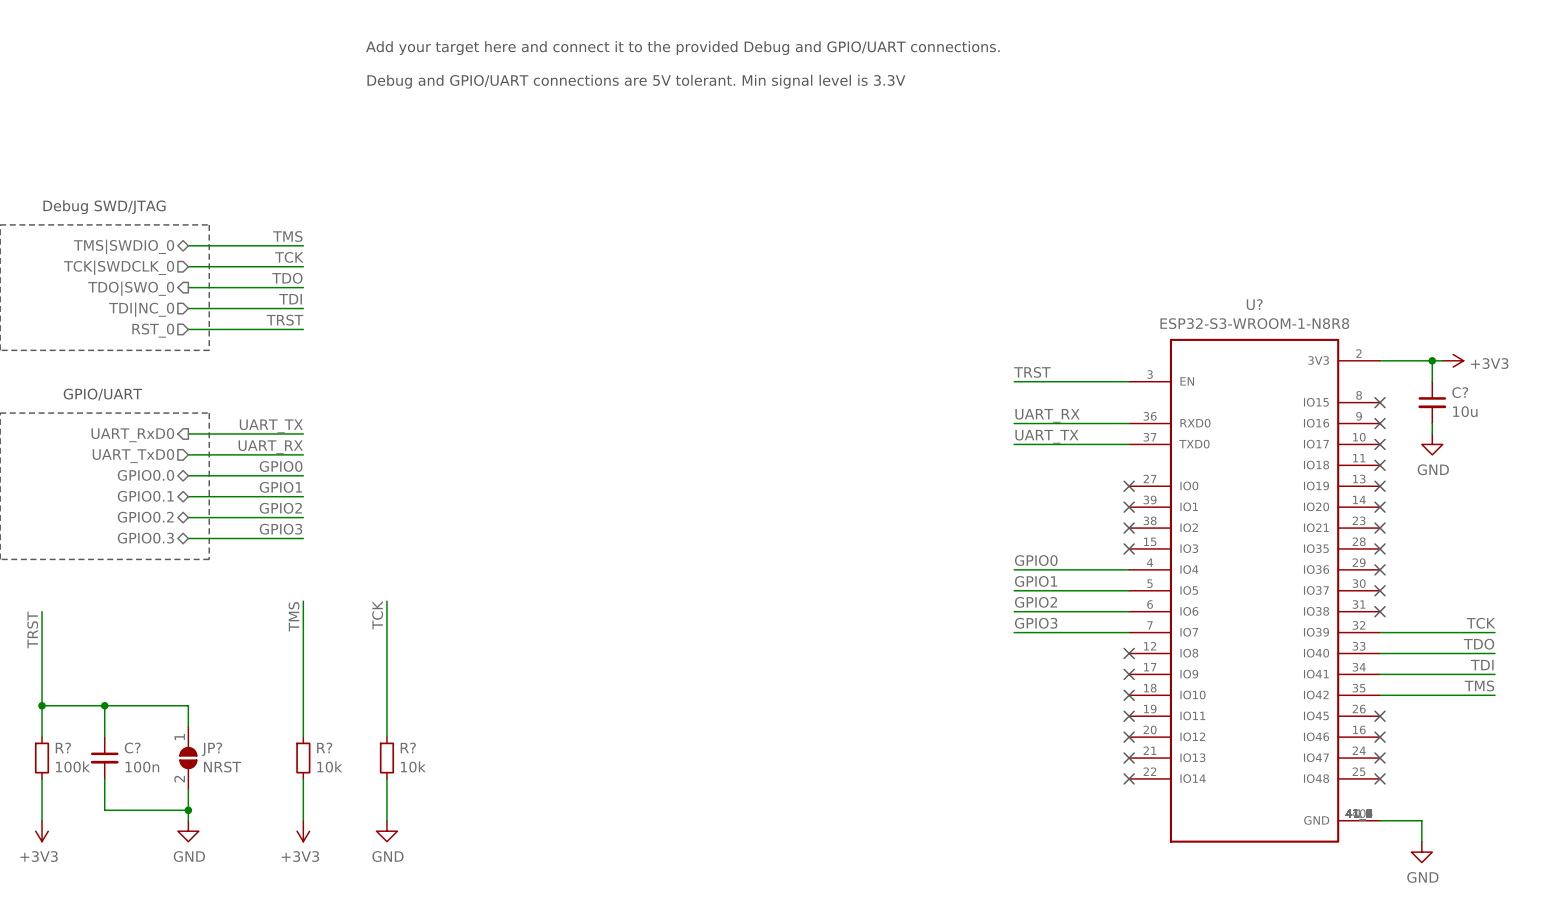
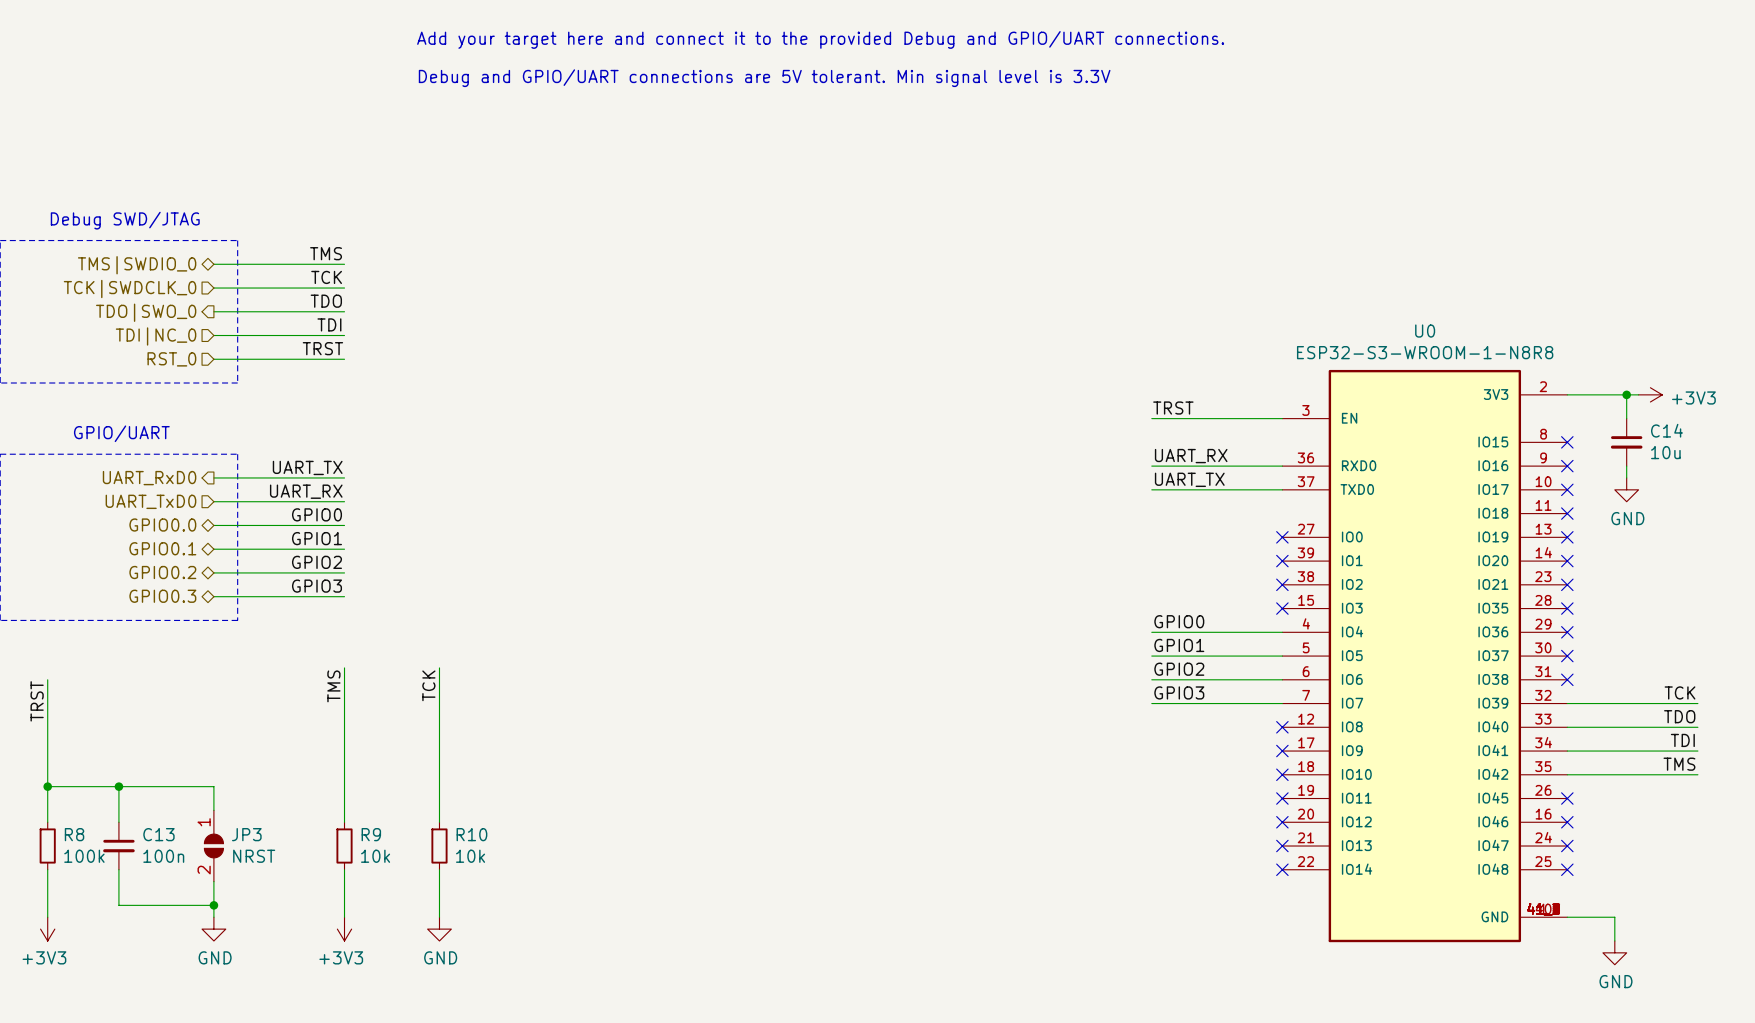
U? name: U? (1254, 304) -> U0 (1425, 331)
C? name: C? (1460, 392) -> C14 (1666, 430)
R? name: R? (63, 747) -> R8 (74, 834)
R? name: R? (324, 747) -> R9 (371, 834)
R? name: R? (408, 747) -> R10 (471, 834)
C? name: C? (132, 748) -> C13 (158, 834)
JP? name: JP? (211, 749) -> JP3 (246, 834)

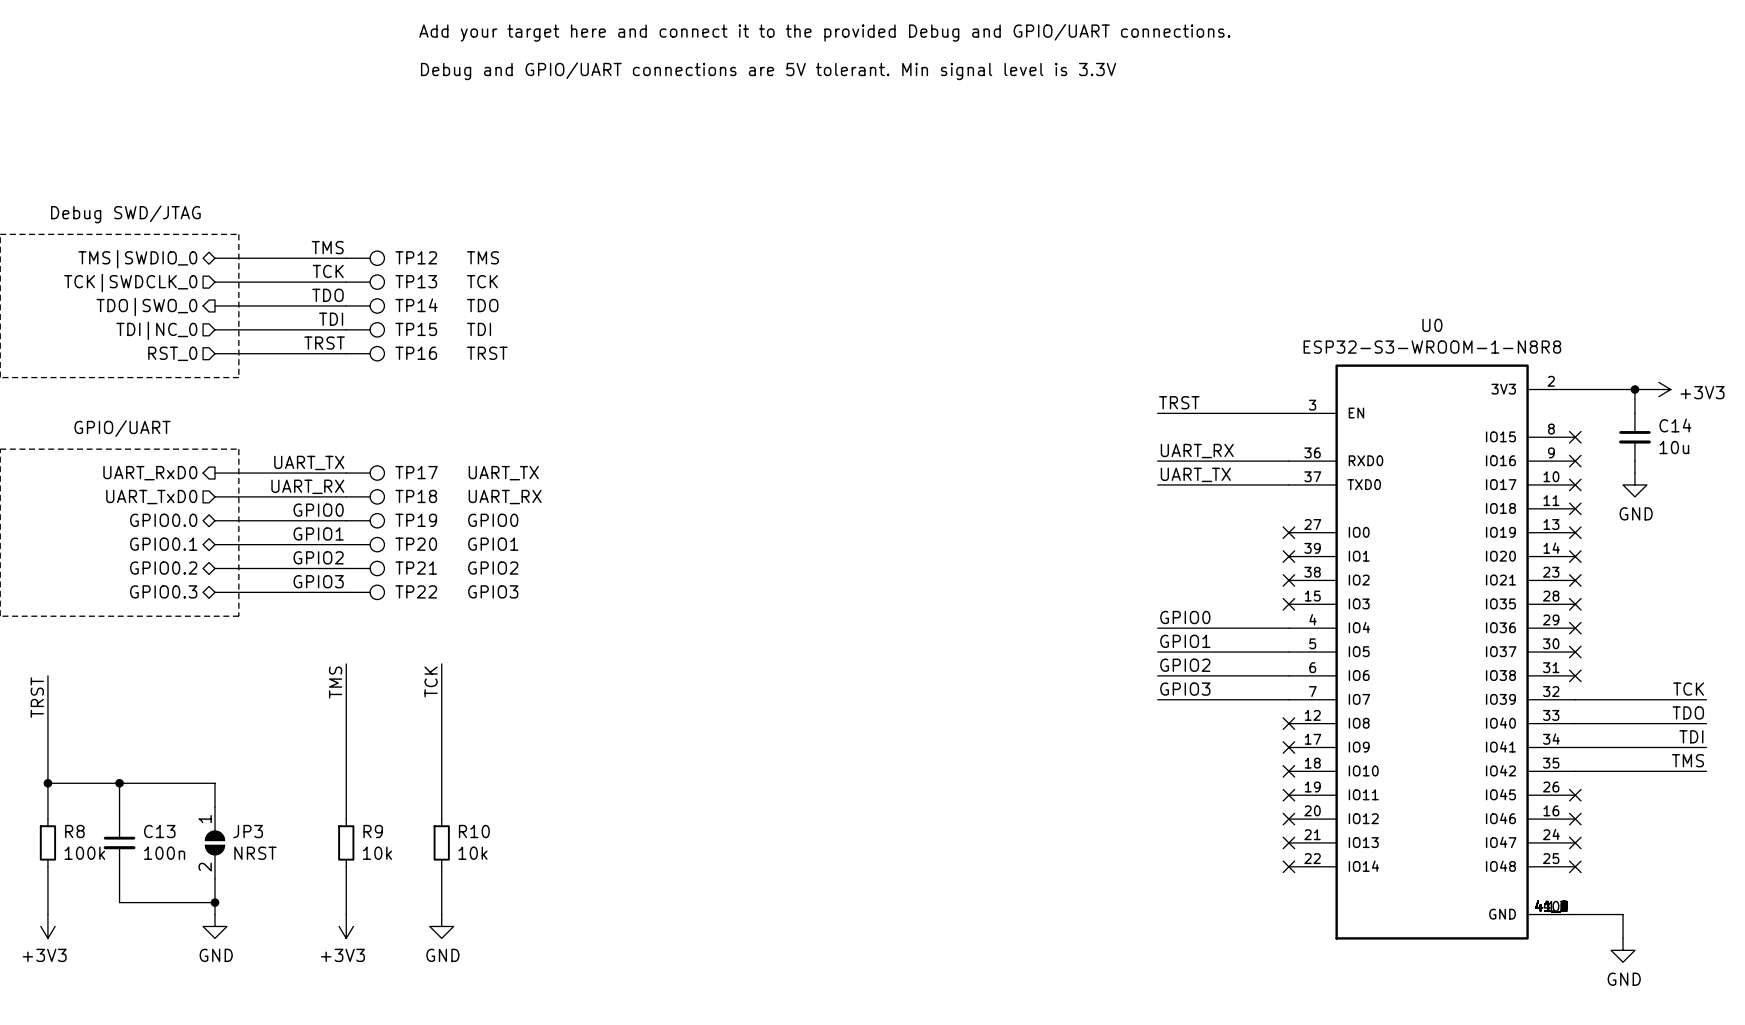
TP12: none -> TMS (365, 258)
TP13: none -> TCK (365, 282)
TP14: none -> TDO (365, 305)
TP15: none -> TDI (365, 329)
TP16: none -> TRST (365, 353)
TP17: none -> UART_TX (365, 473)
TP18: none -> UART_RX (365, 496)
TP19: none -> GPIO0 (365, 520)
TP20: none -> GPIO1 (365, 544)
TP21: none -> GPIO2 (365, 568)
TP22: none -> GPIO3 (365, 592)

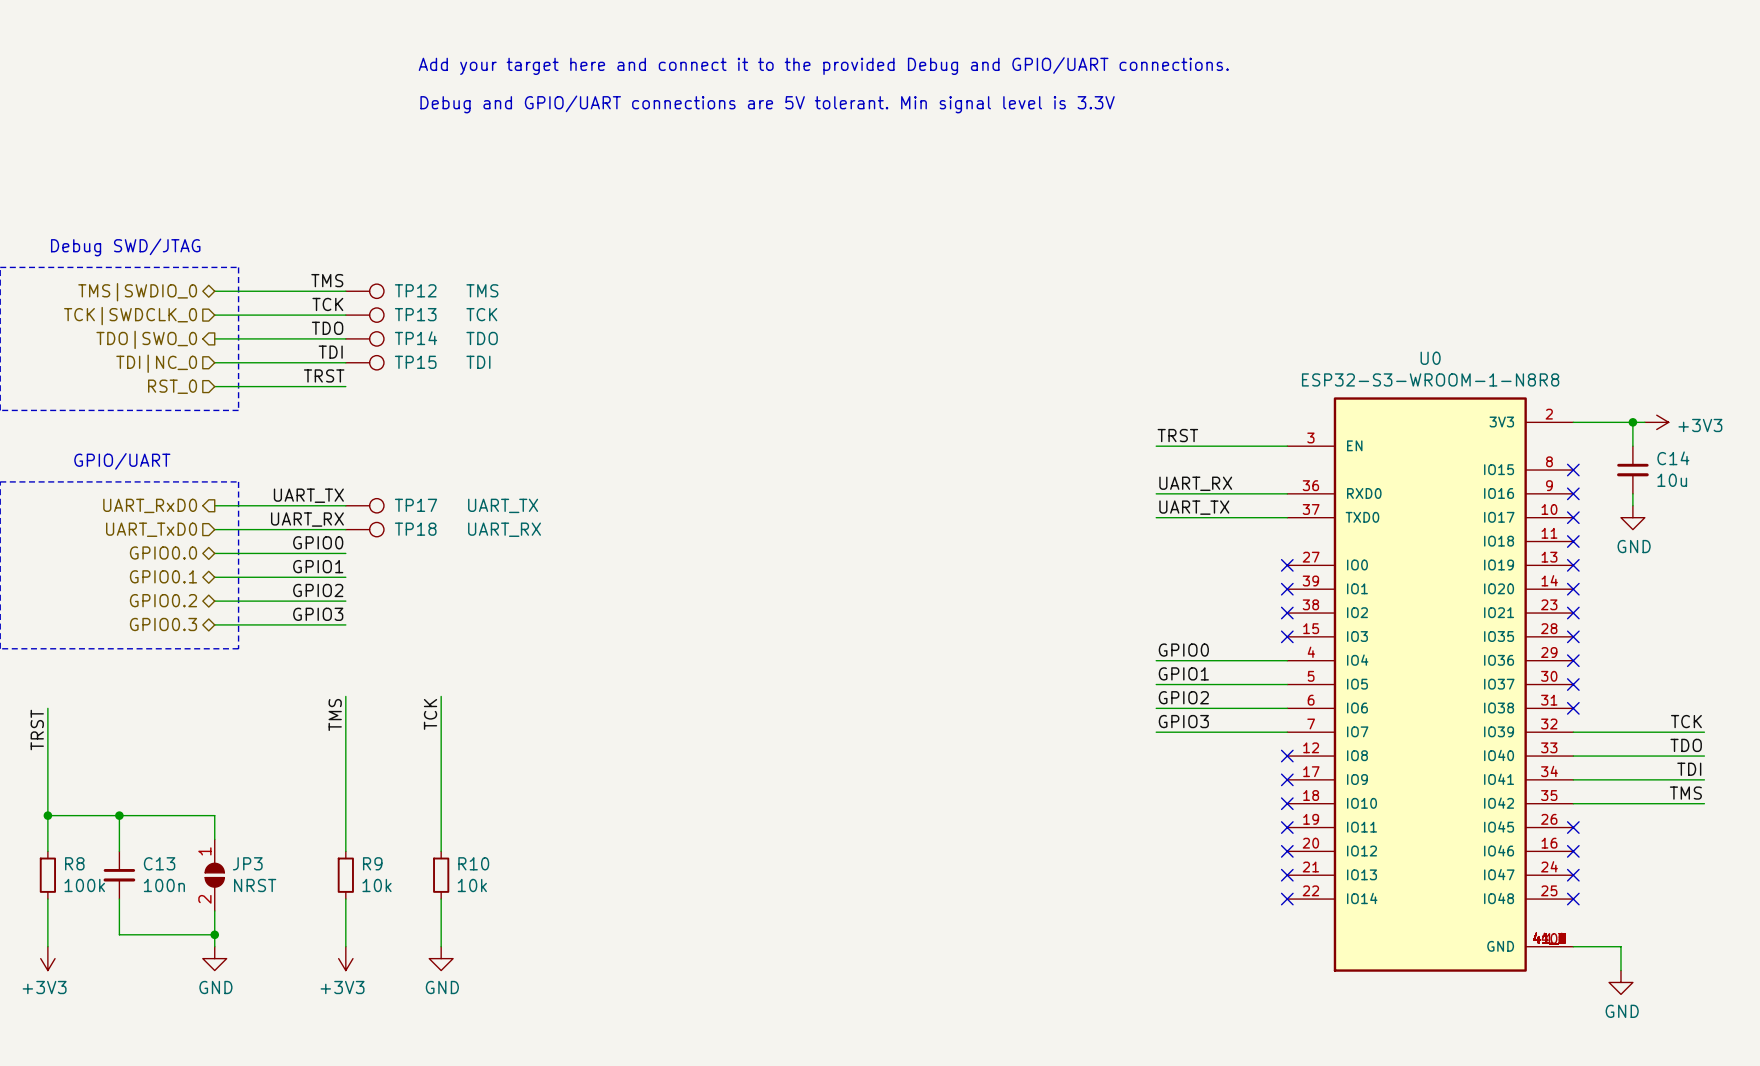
TP16: TRST (365, 353) -> none
TP19: GPIO0 (365, 520) -> none
TP20: GPIO1 (365, 544) -> none
TP21: GPIO2 (365, 568) -> none
TP22: GPIO3 (365, 592) -> none

